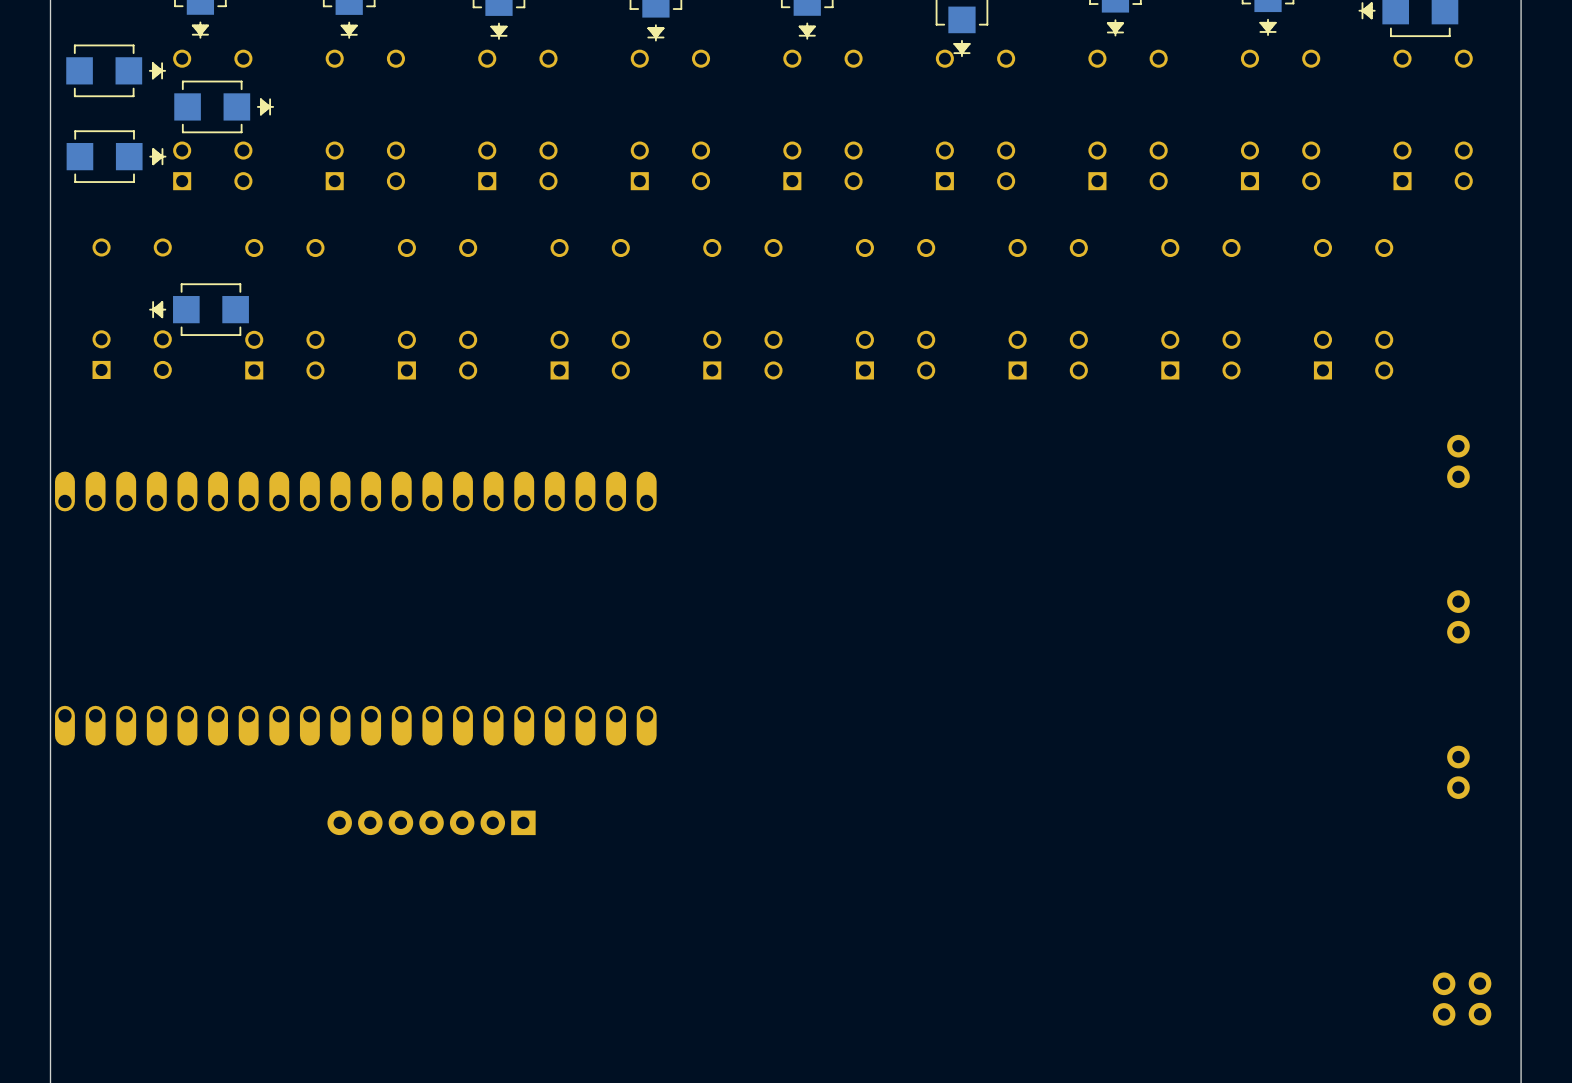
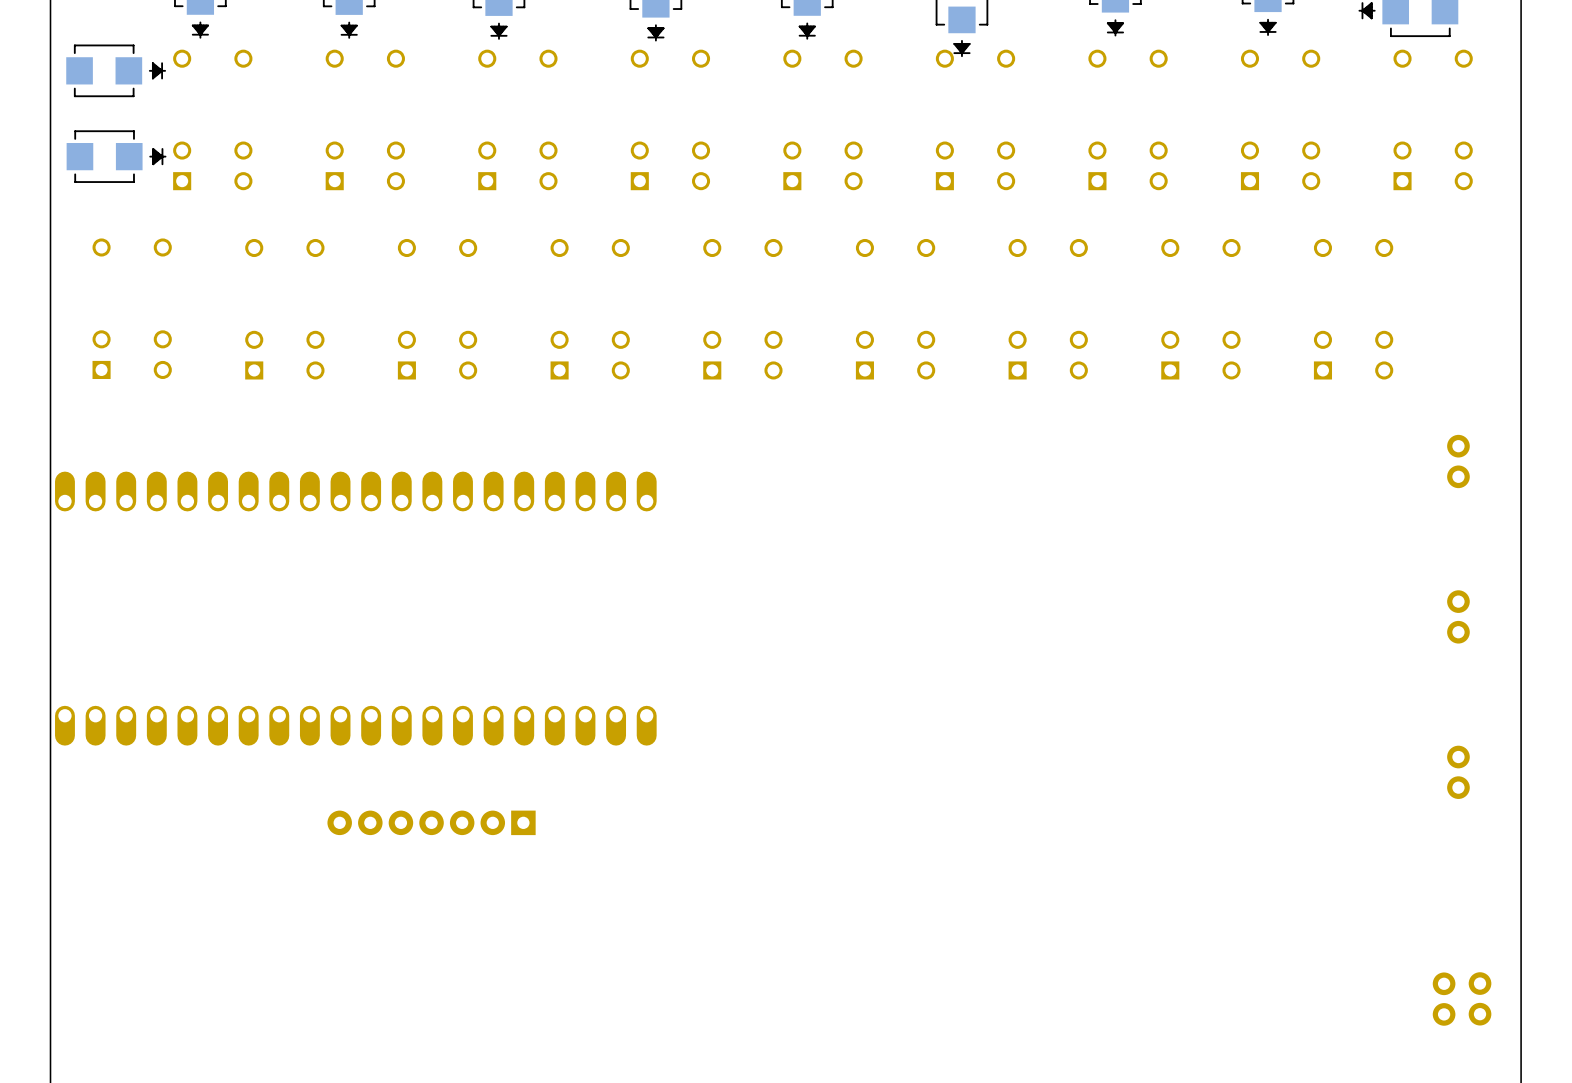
part: (224, 106) -> none
part: (199, 309) -> none

